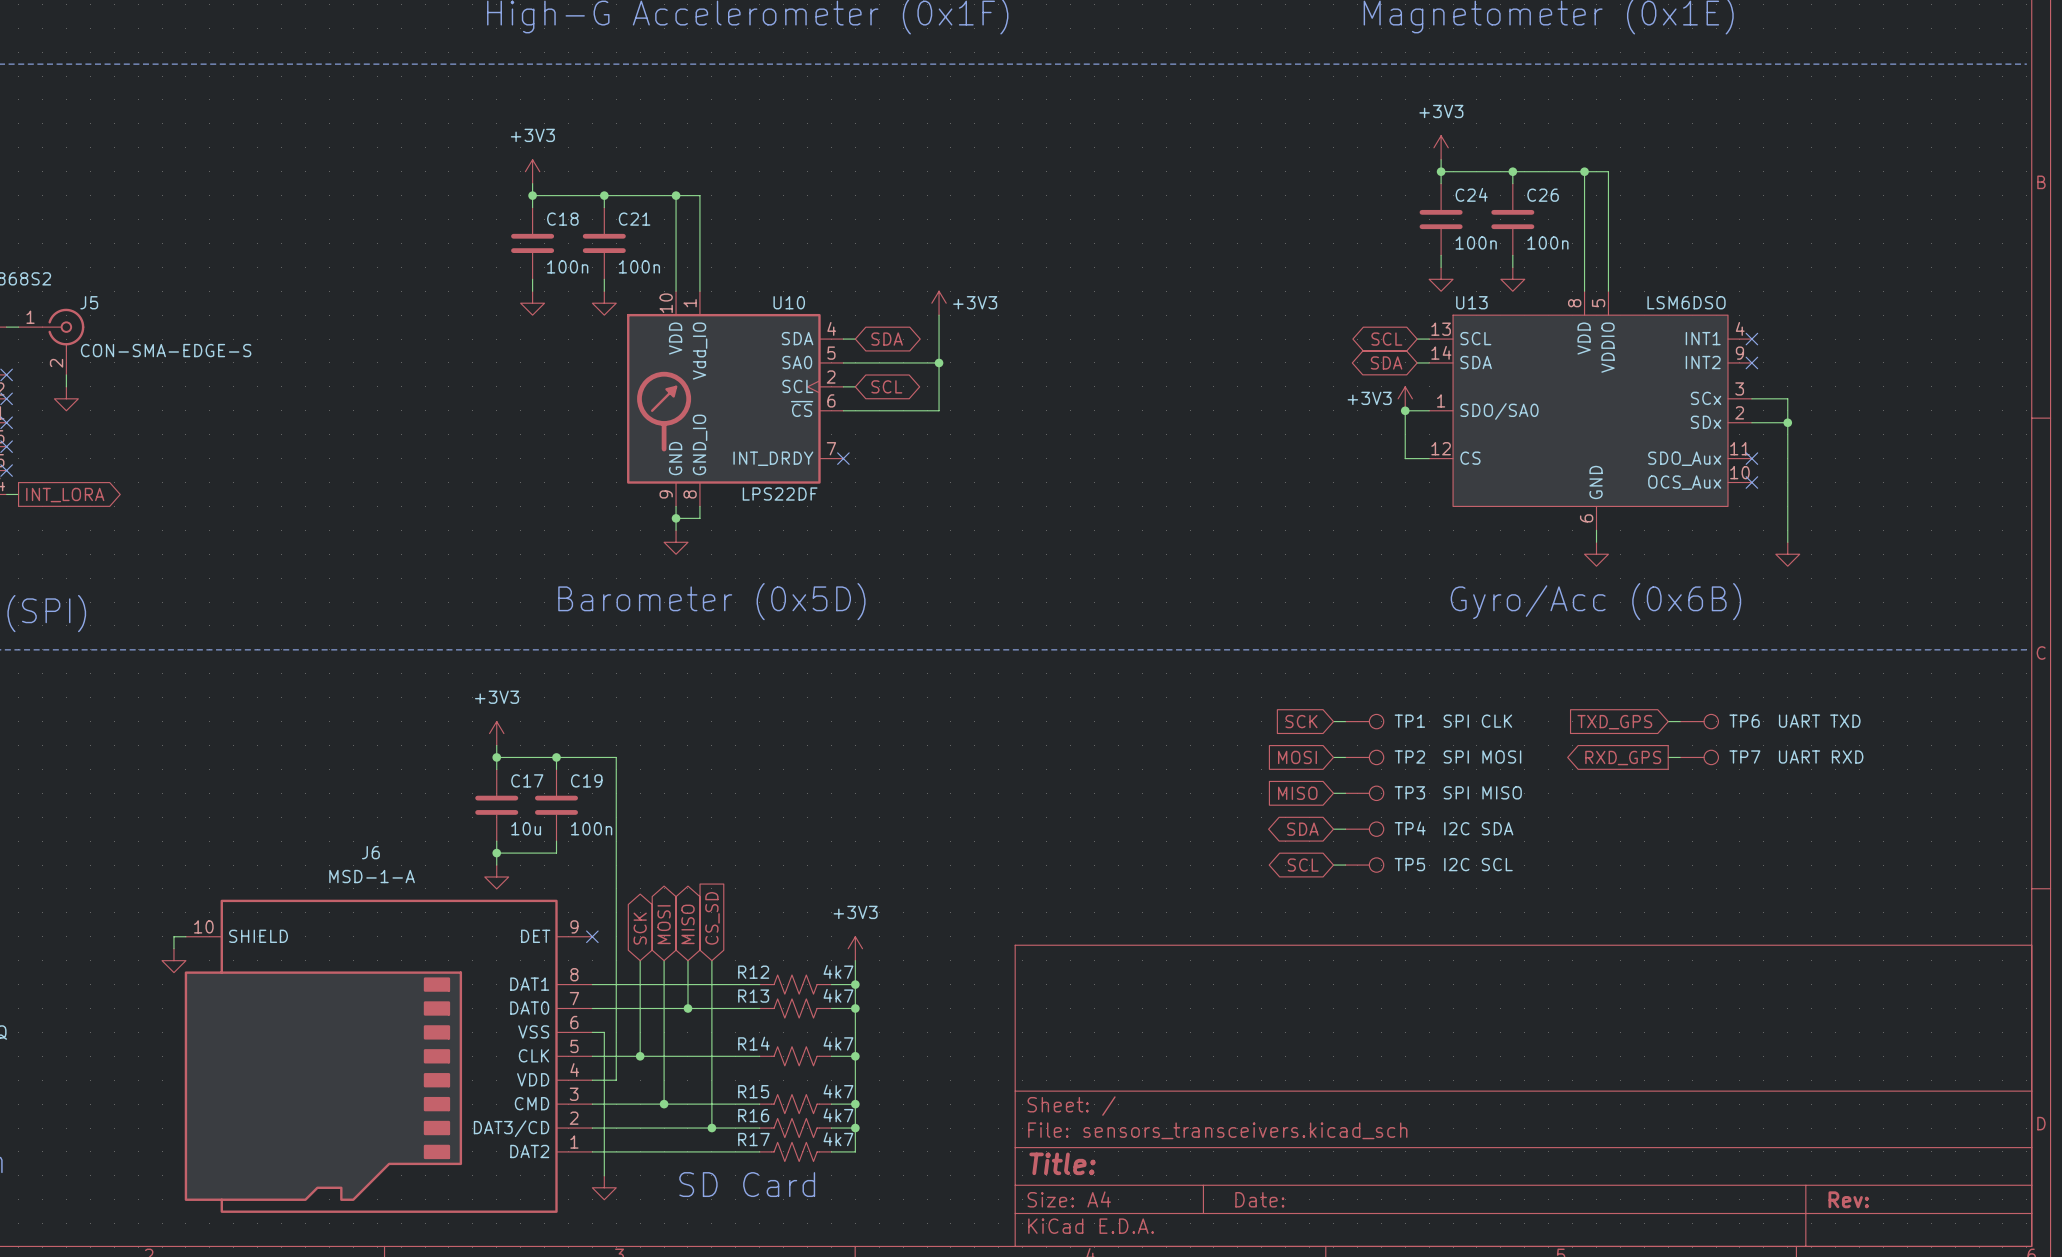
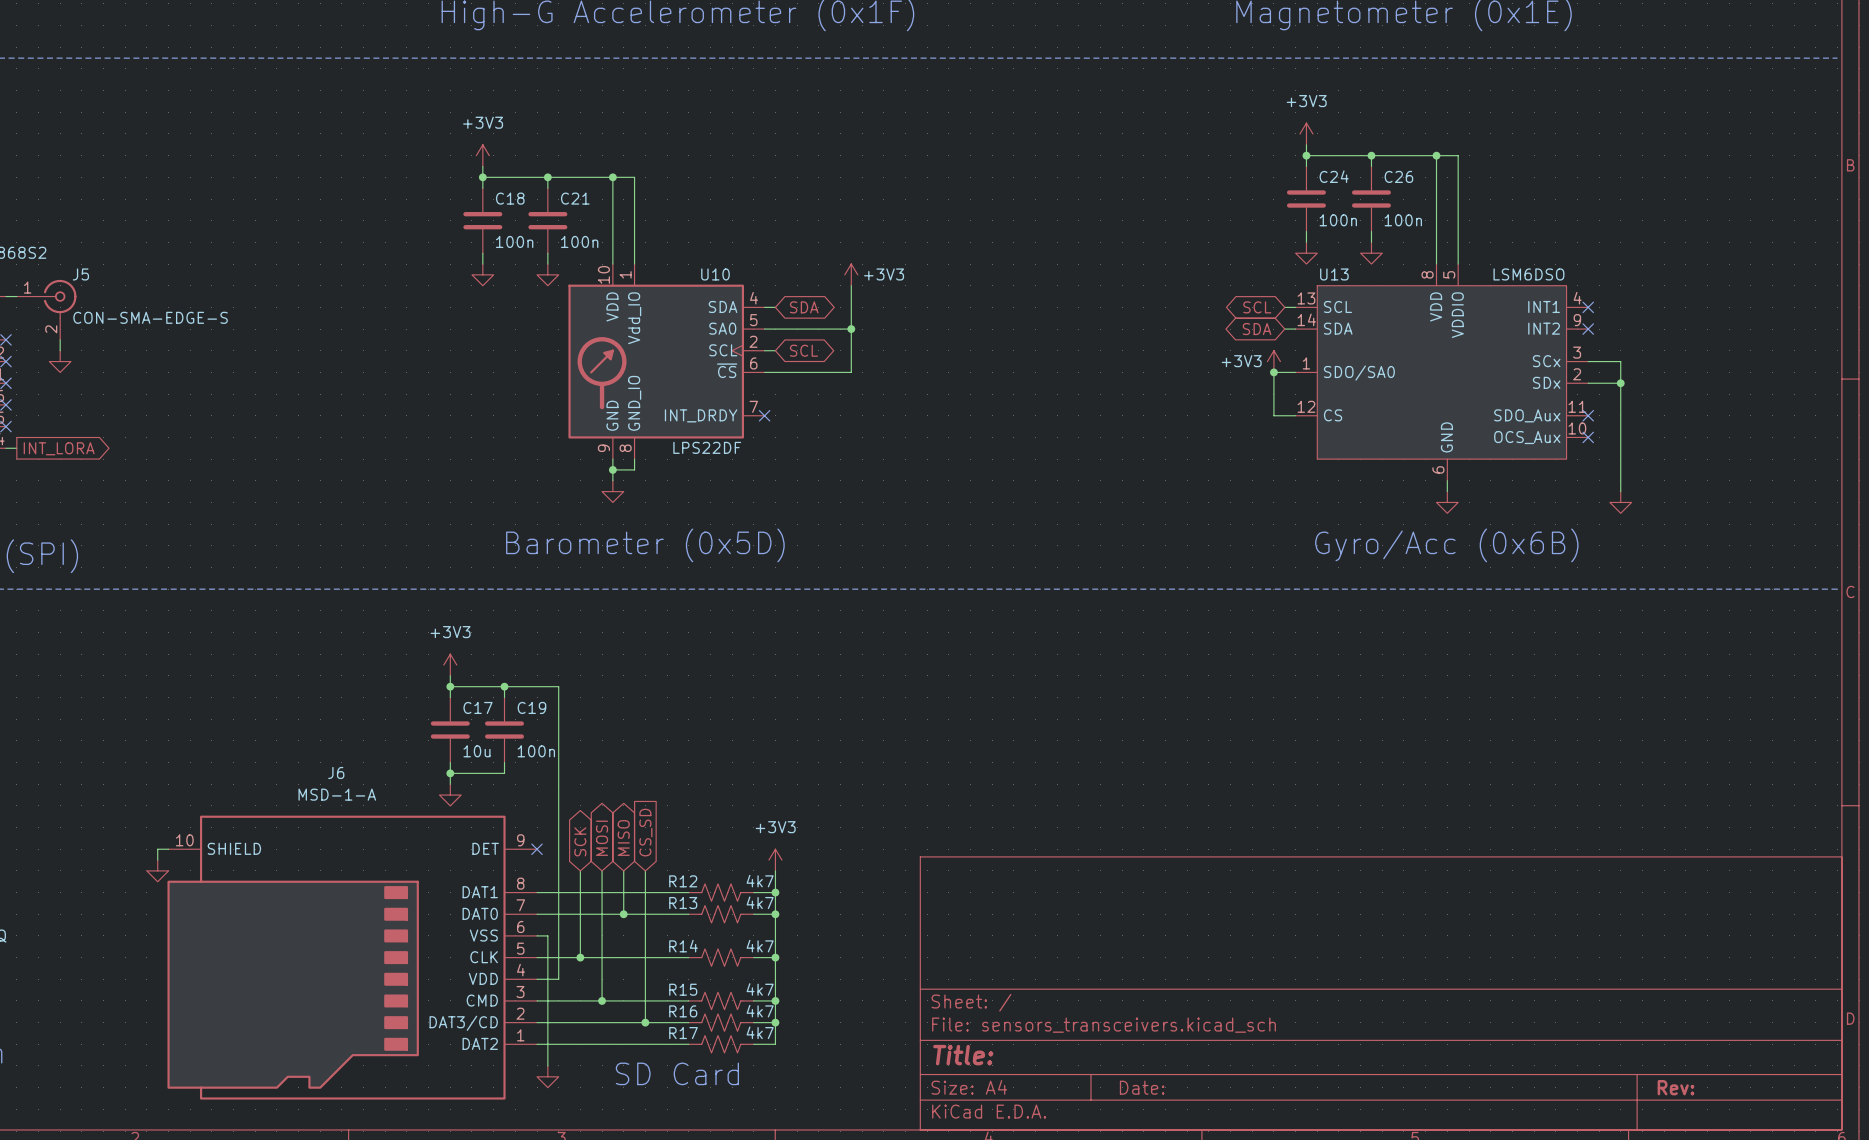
global label: SCK (1301, 721) -> none
wire: (1333, 721) (1345, 721) -> none
TP1: SPI CLK (1364, 721) -> none
wire: (1668, 721) (1680, 721) -> none
TP6: UART TXD (1699, 721) -> none
global label: TXD_GPS (1614, 722) -> none
global label: MOSI (1297, 757) -> none
wire: (1333, 757) (1345, 757) -> none
TP2: SPI MOSI (1364, 757) -> none
wire: (1668, 757) (1680, 757) -> none
TP7: UART RXD (1699, 757) -> none
global label: RXD_GPS (1623, 758) -> none
global label: MISO (1297, 793) -> none
wire: (1333, 793) (1345, 793) -> none
TP3: SPI MISO (1364, 793) -> none
global label: SDA (1302, 829) -> none
wire: (1333, 829) (1345, 829) -> none
TP4: I2C SDA (1364, 829) -> none
global label: SCL (1303, 865) -> none
wire: (1333, 865) (1345, 865) -> none
TP5: I2C SCL (1364, 865) -> none

